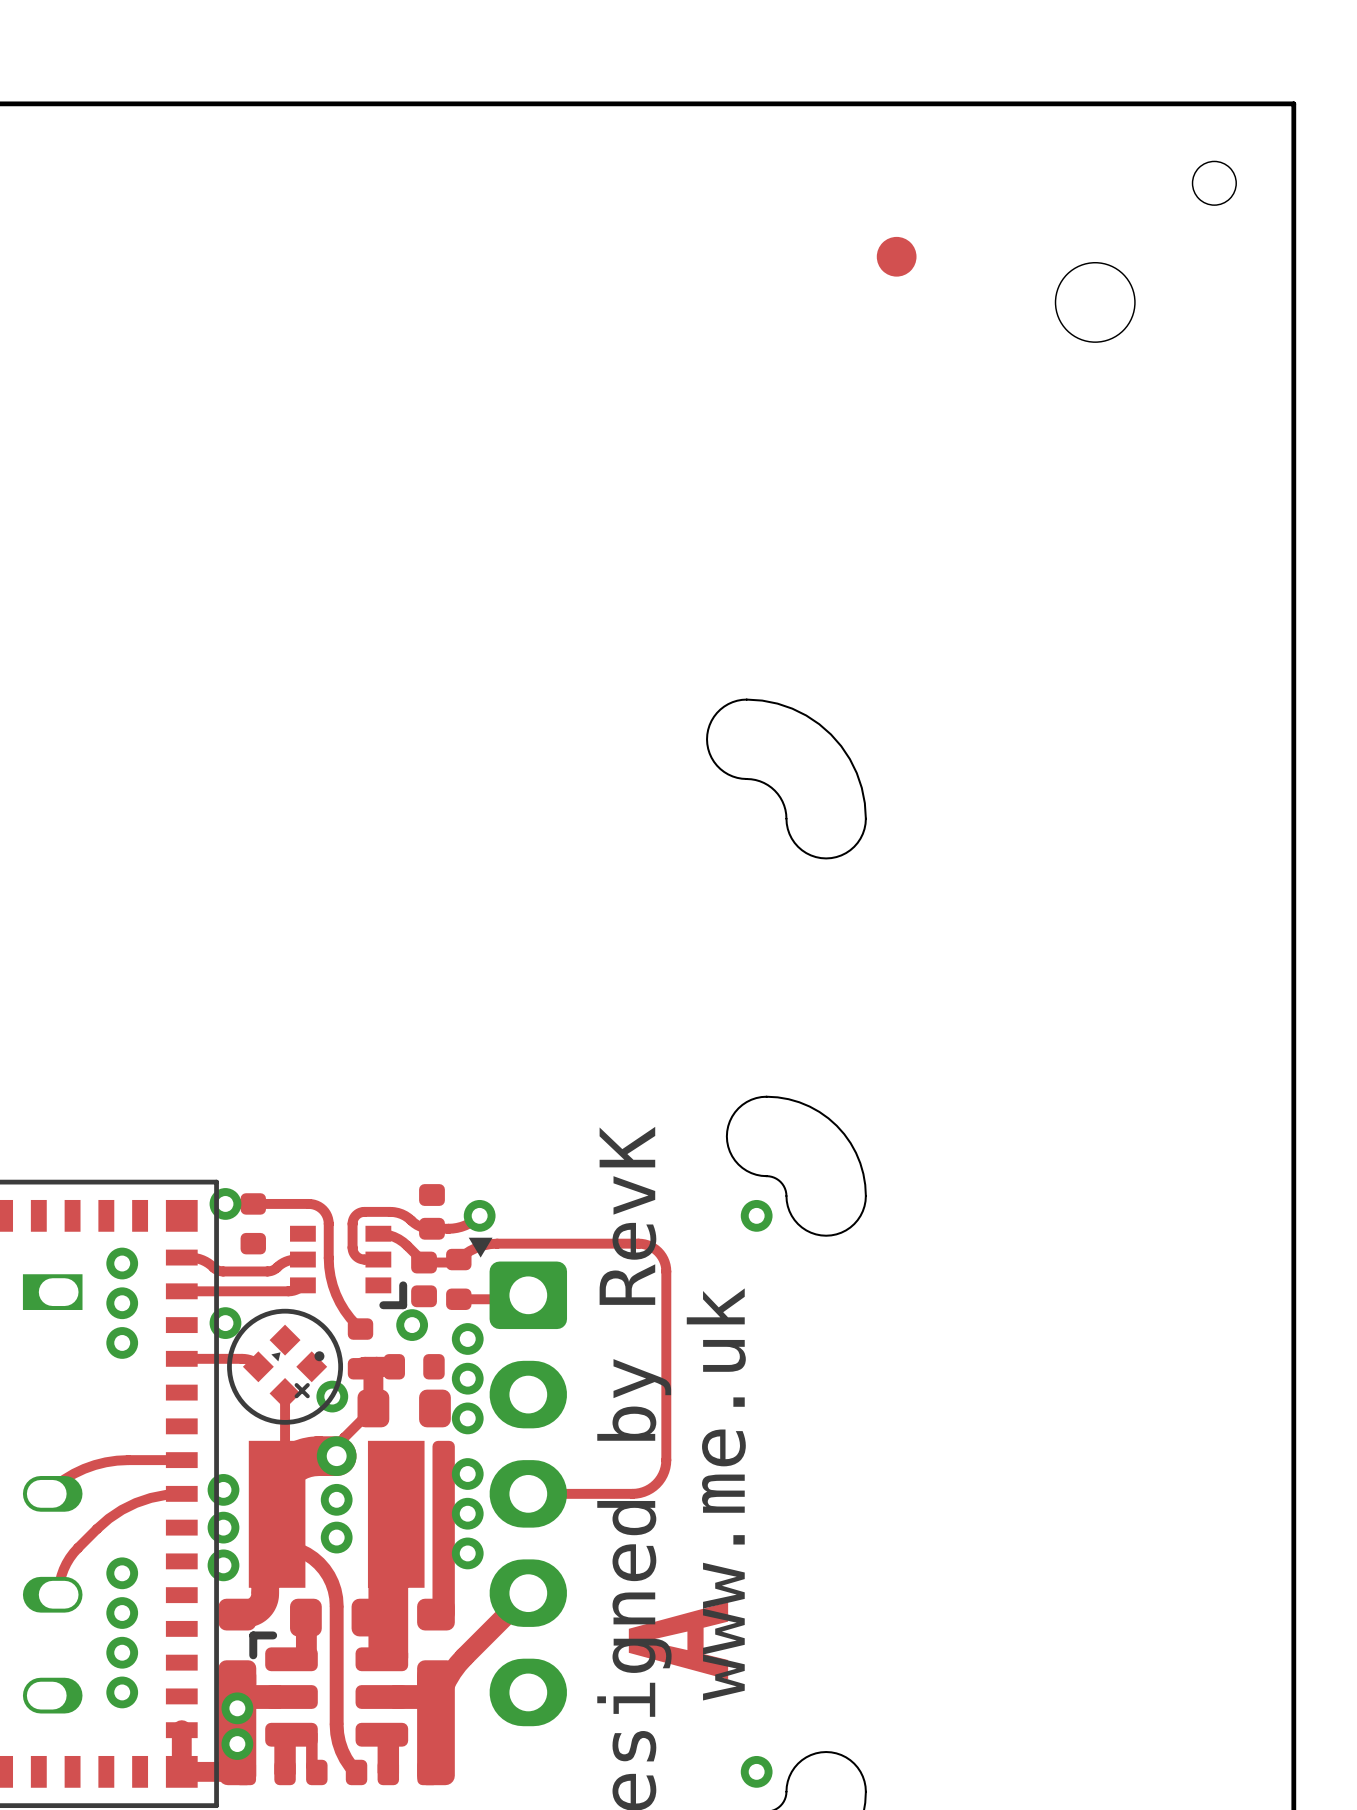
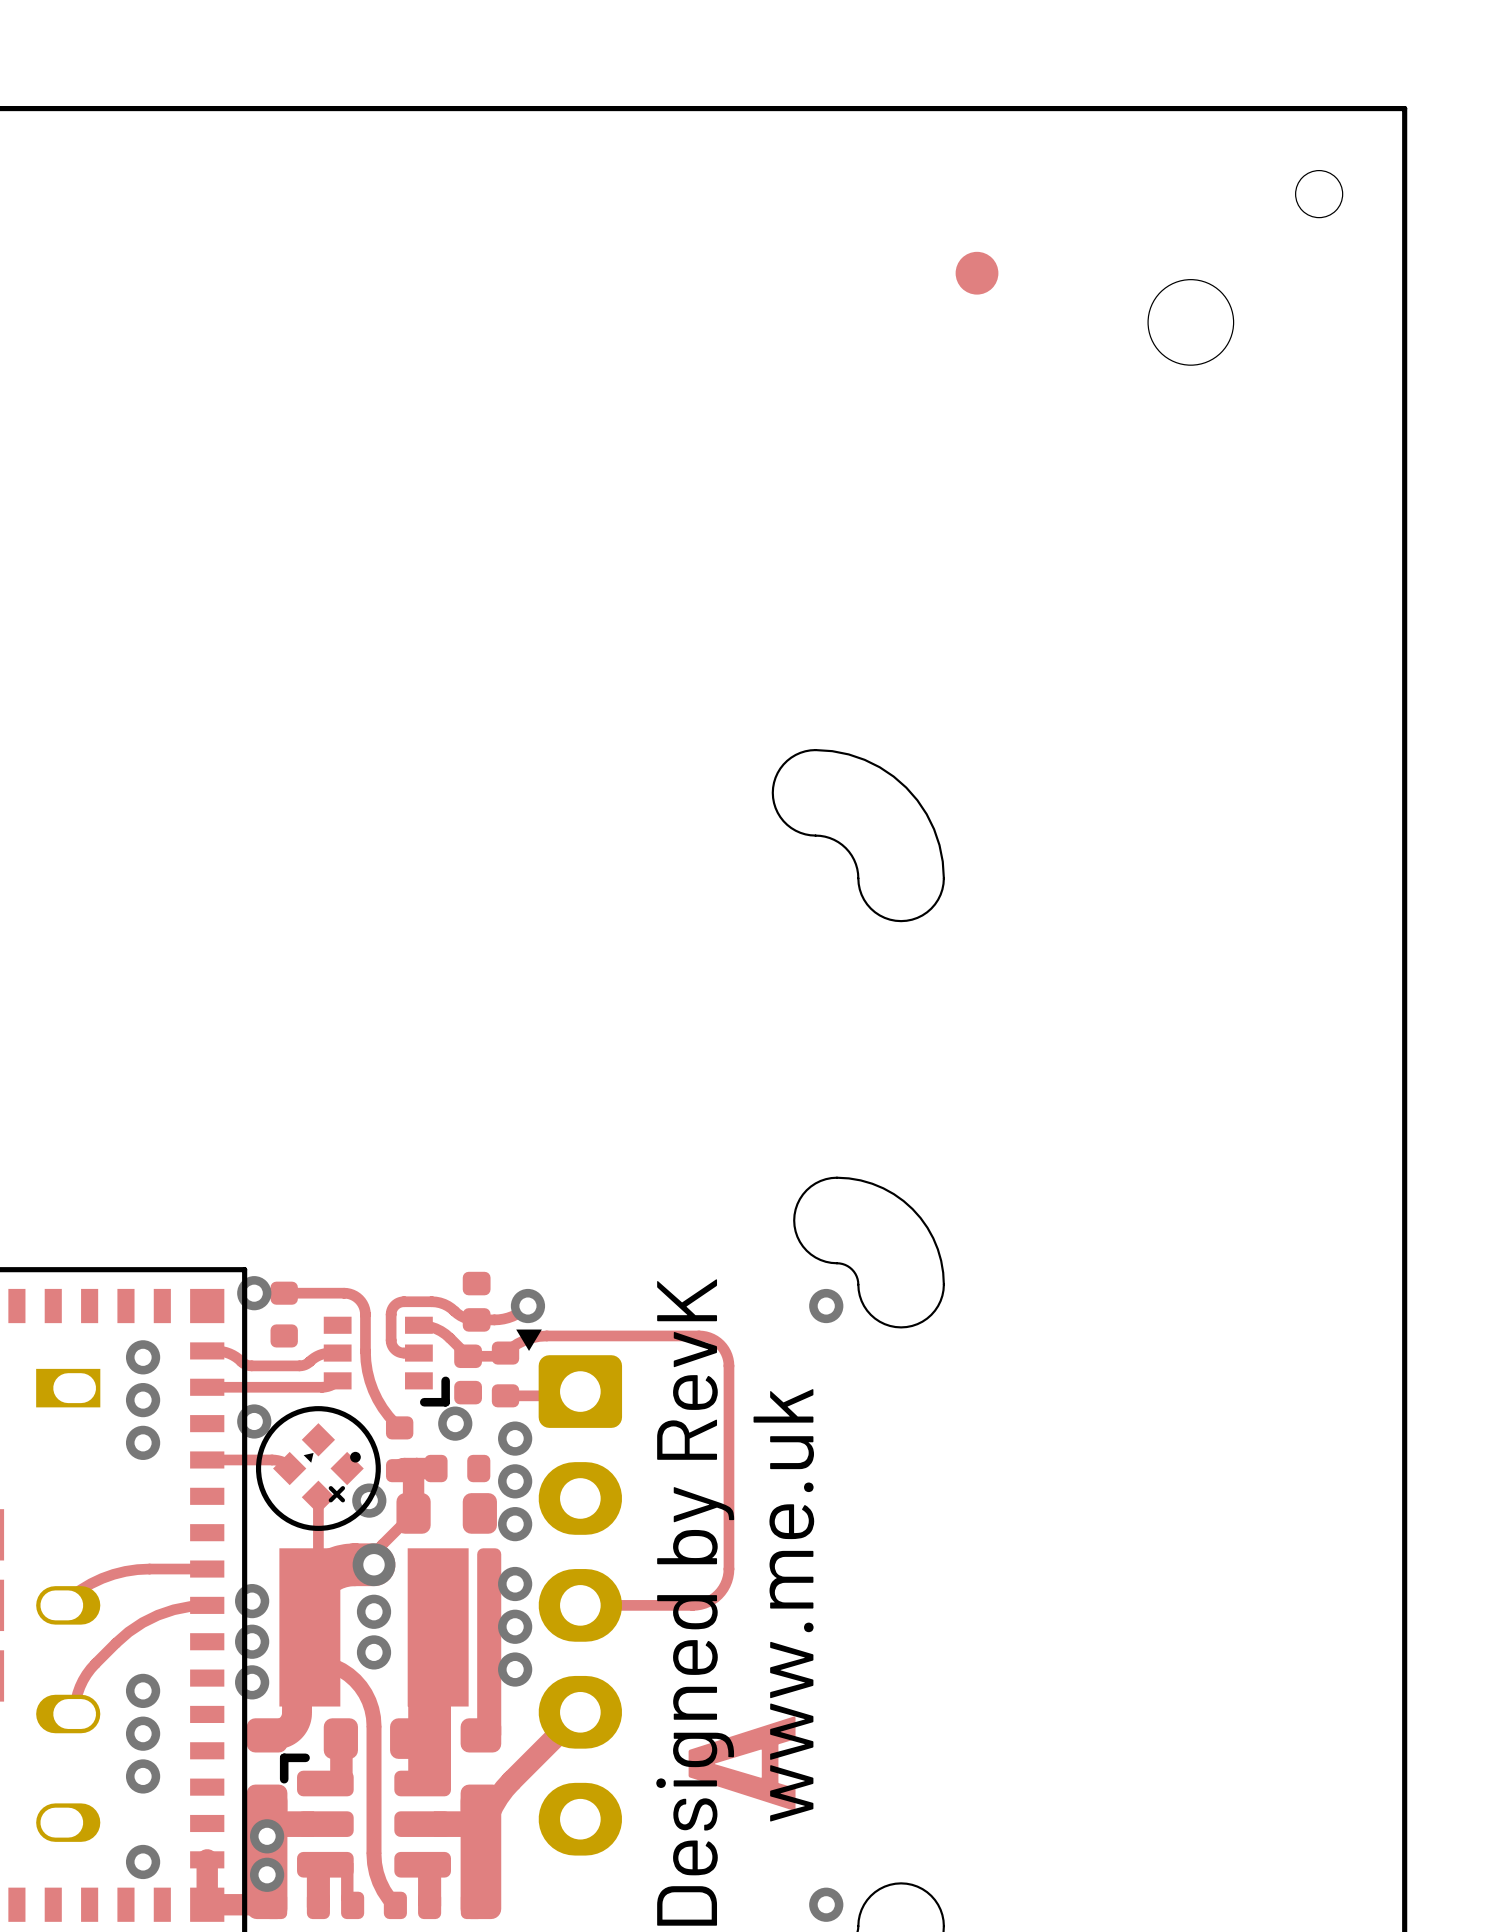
via position: (122, 1692) -> (143, 1861)

